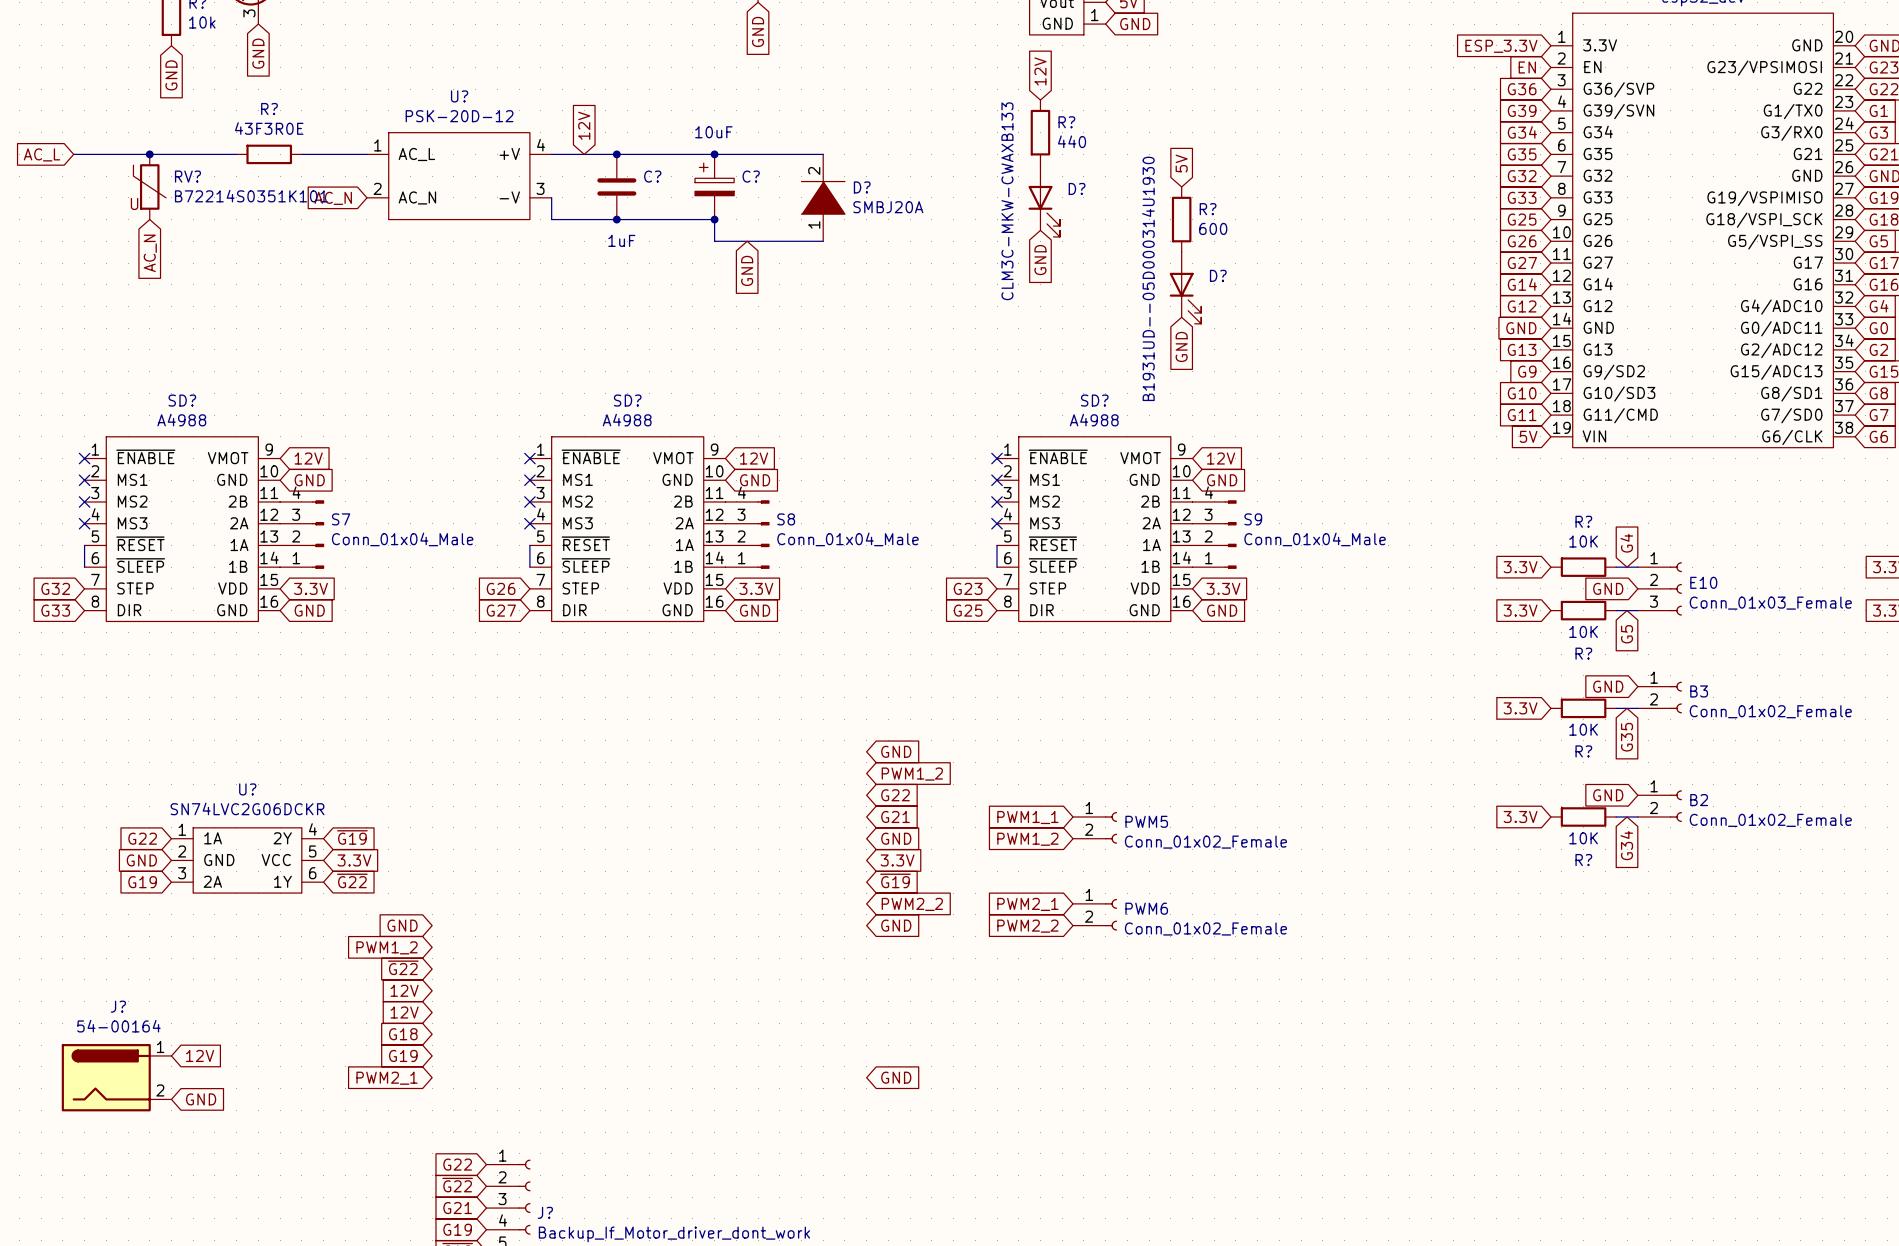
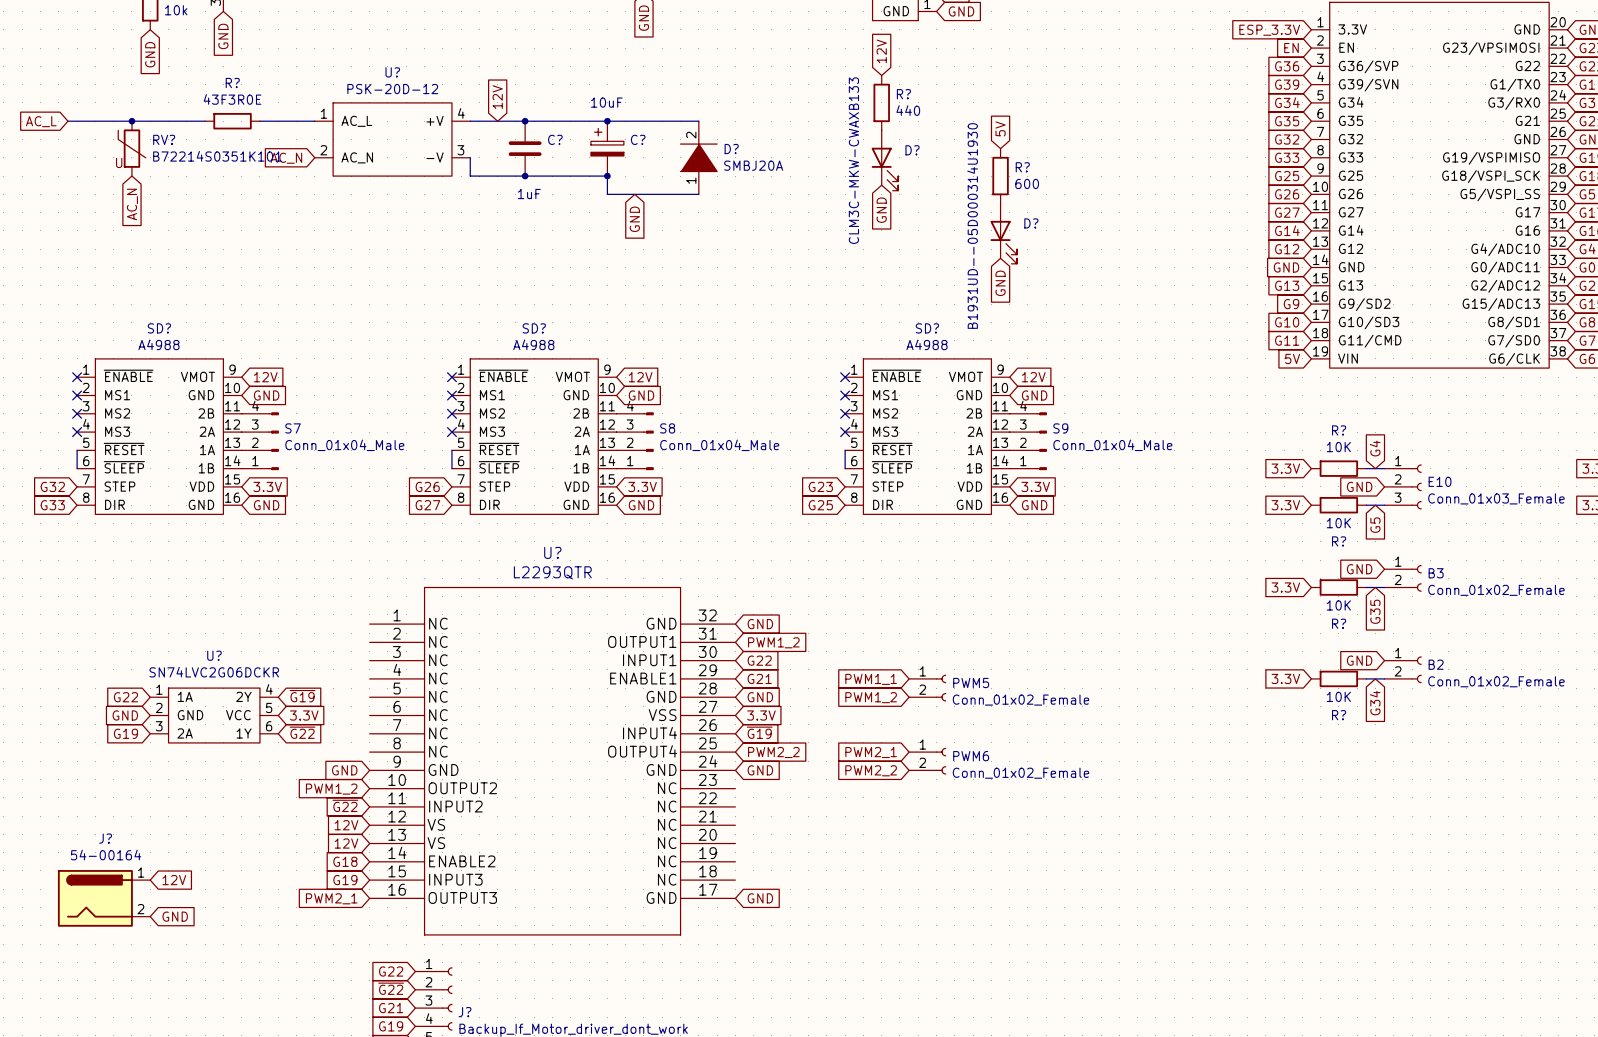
U?: none -> L2293QTR (552, 761)

